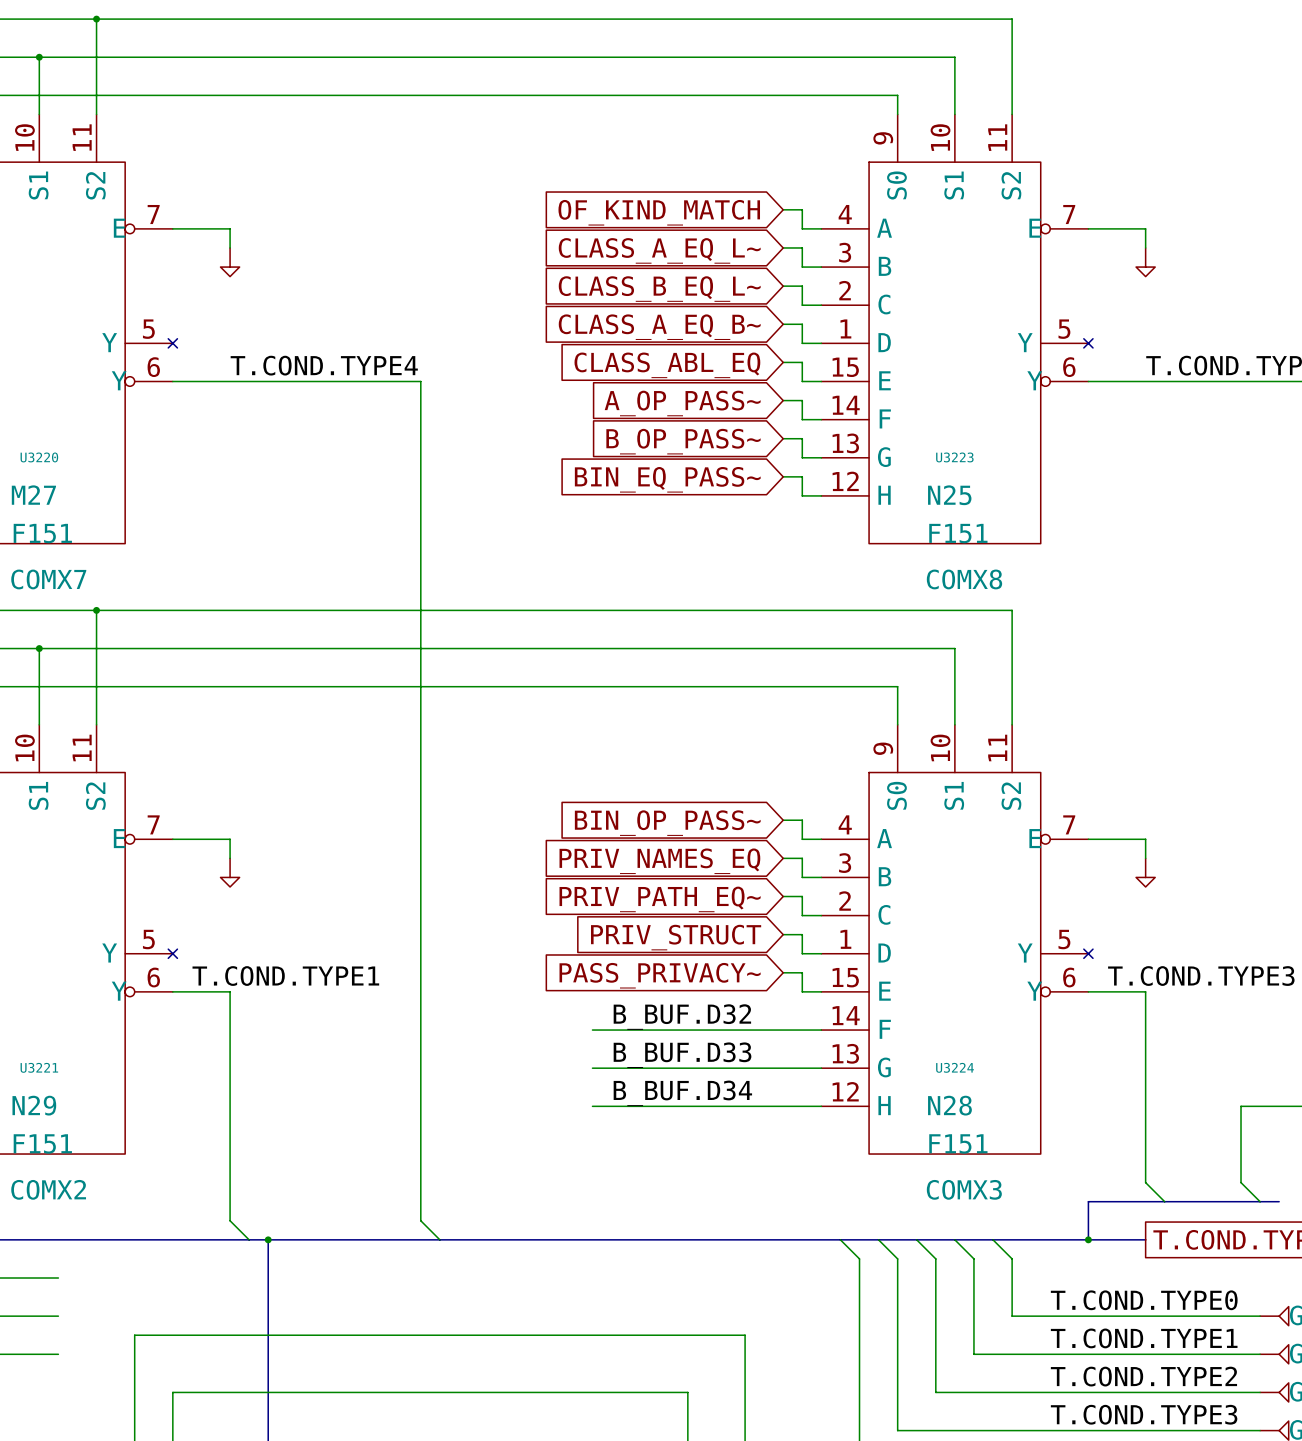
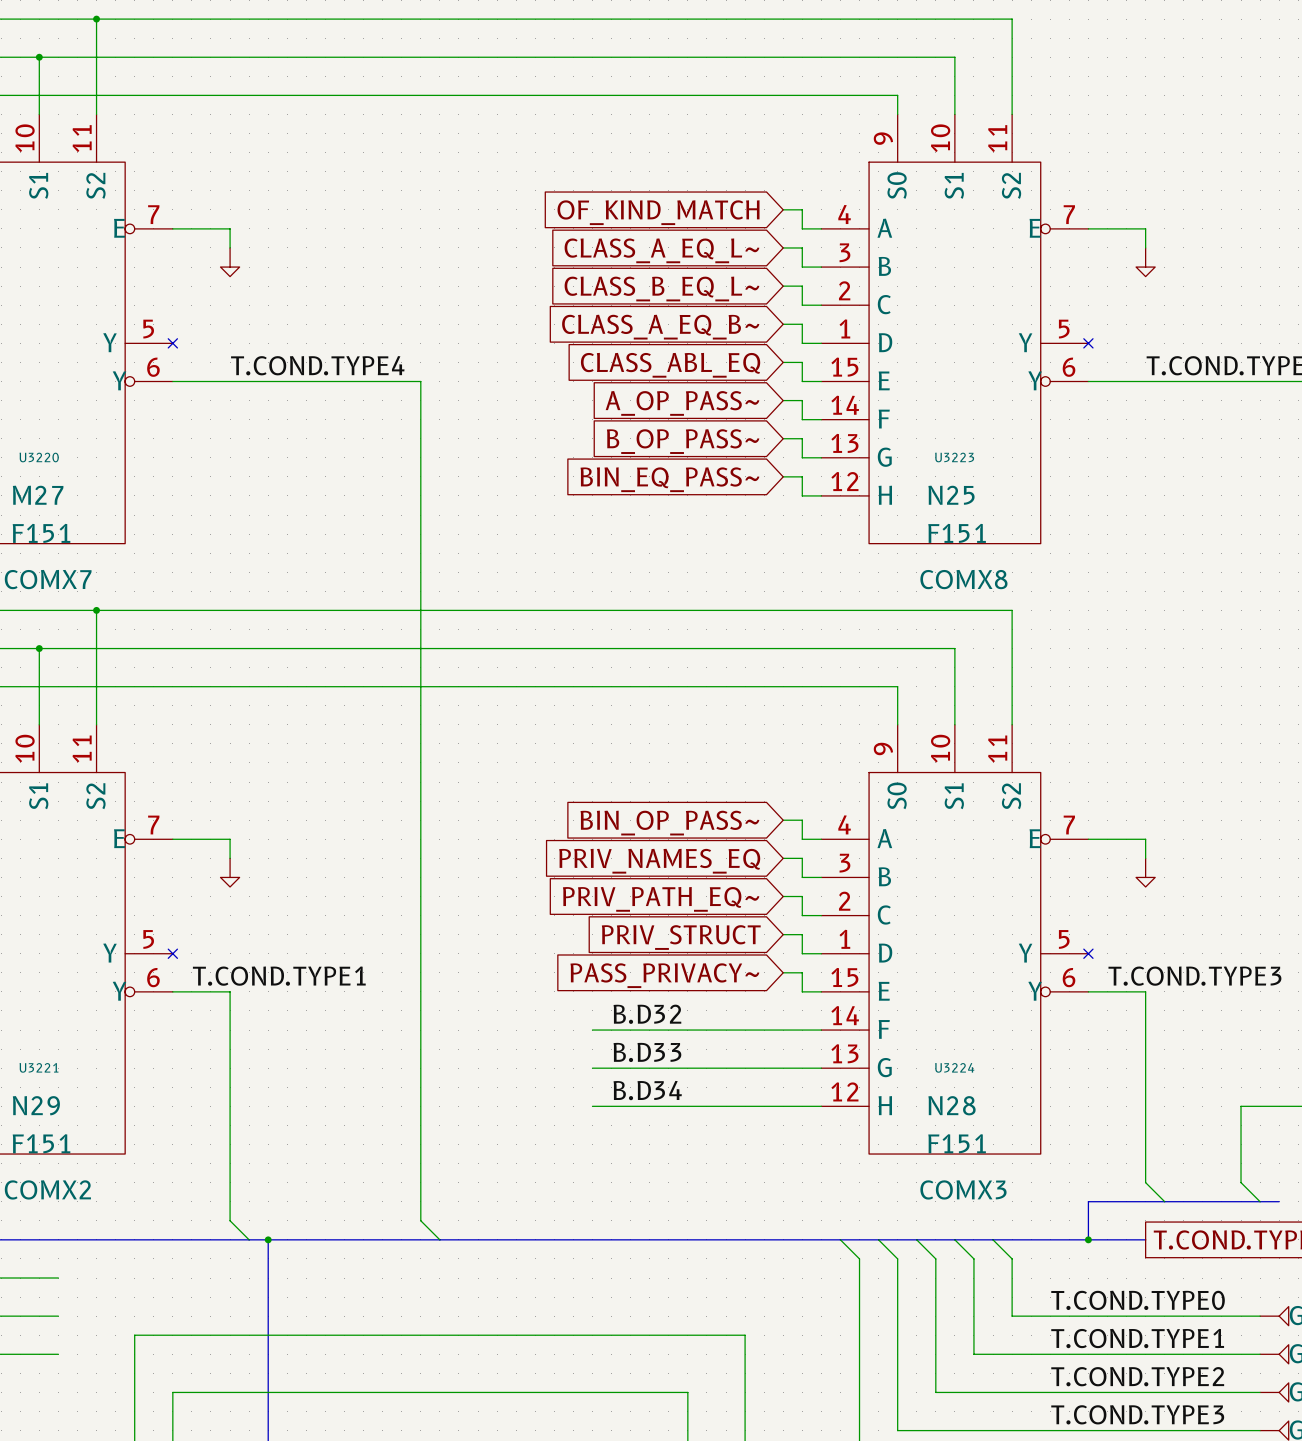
label: B_BUF.D32 (682, 1017) -> B.D32 (647, 1014)
label: B_BUF.D33 (682, 1055) -> B.D33 (647, 1052)
label: B_BUF.D34 (682, 1093) -> B.D34 (647, 1090)

